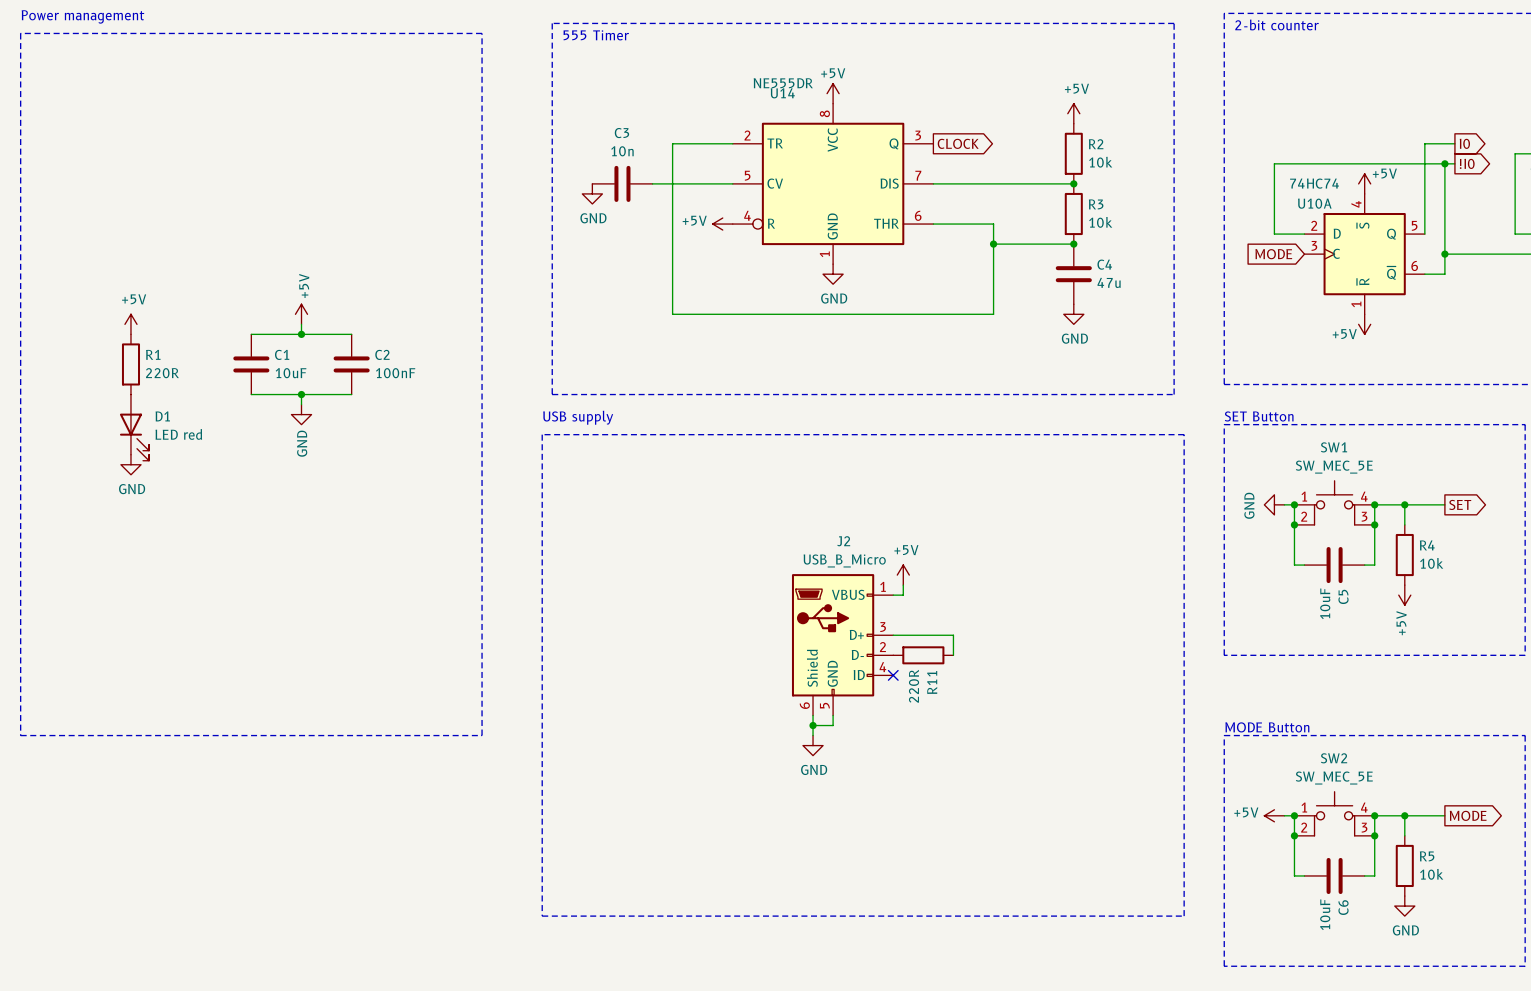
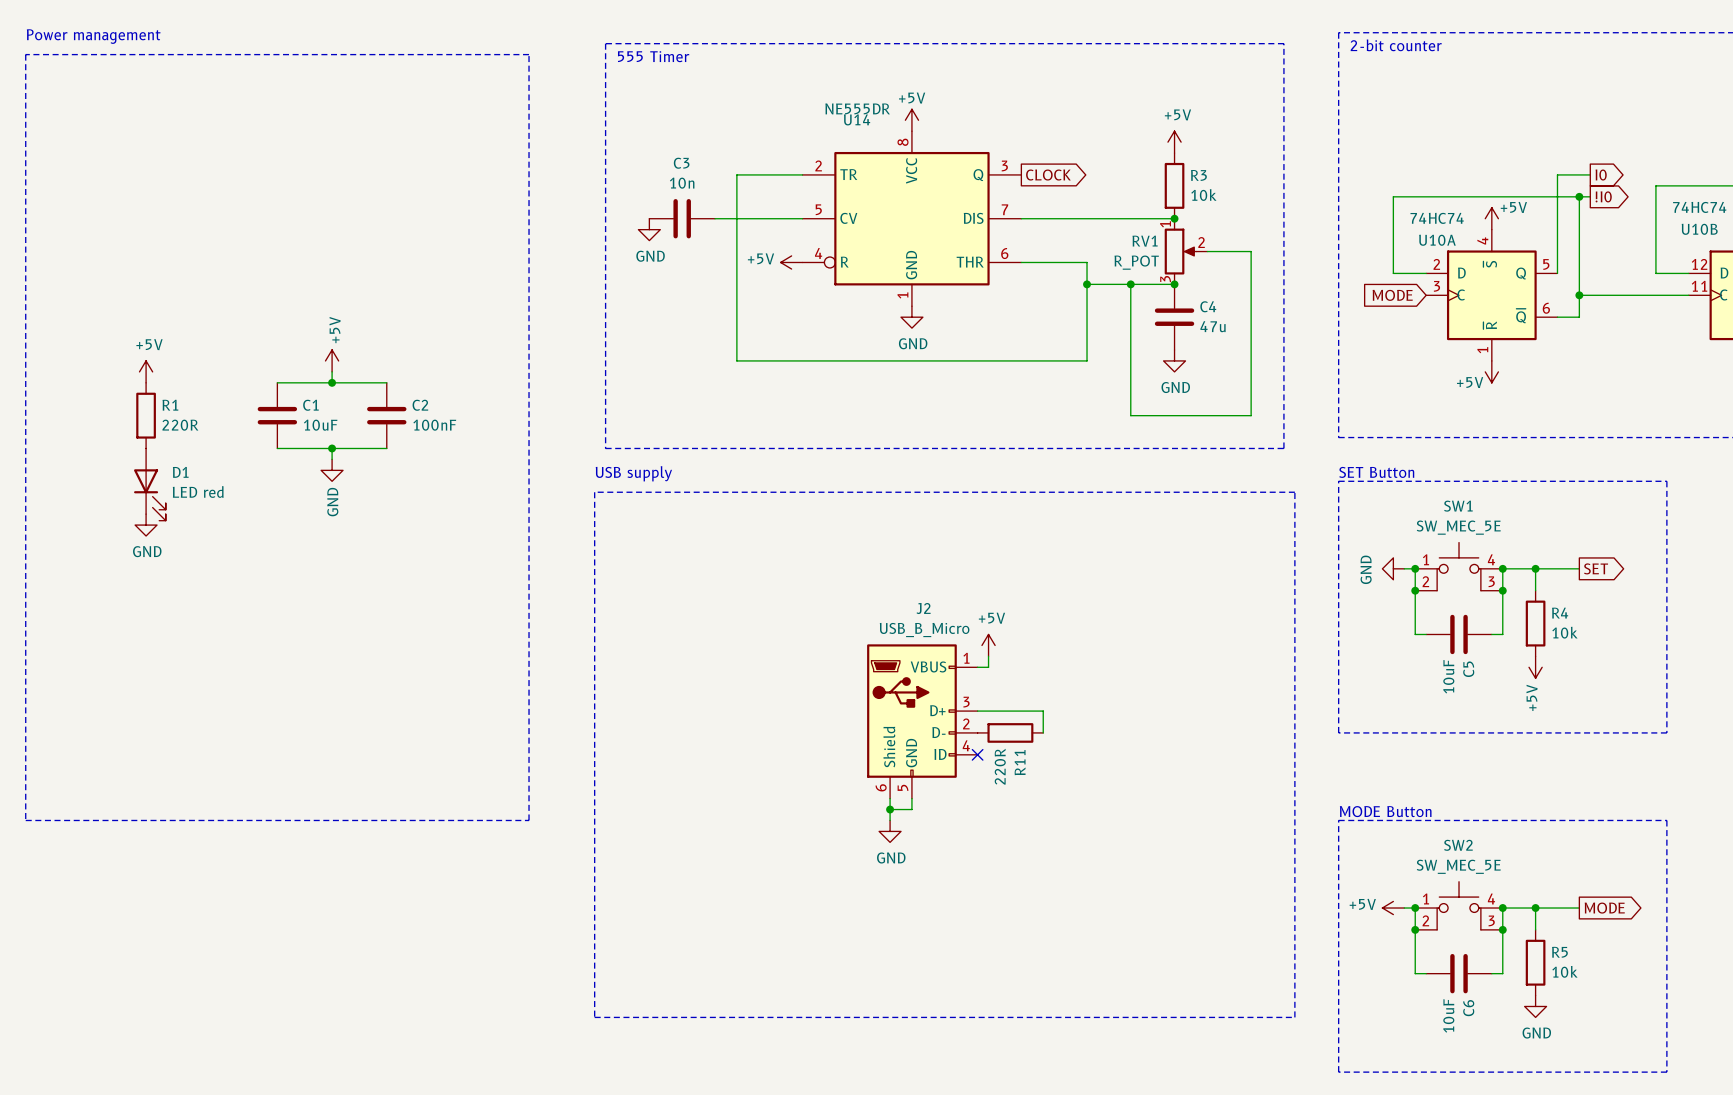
R2 name: R2 (1096, 144) -> R3 (1198, 175)
R3: 10k (1073, 214) -> none
RV1: none -> R_POT (1186, 251)
wire: none -> (1207, 251) (1251, 251) (1251, 415) (1130, 415) (1130, 284)
junction: none -> (1130, 284)

